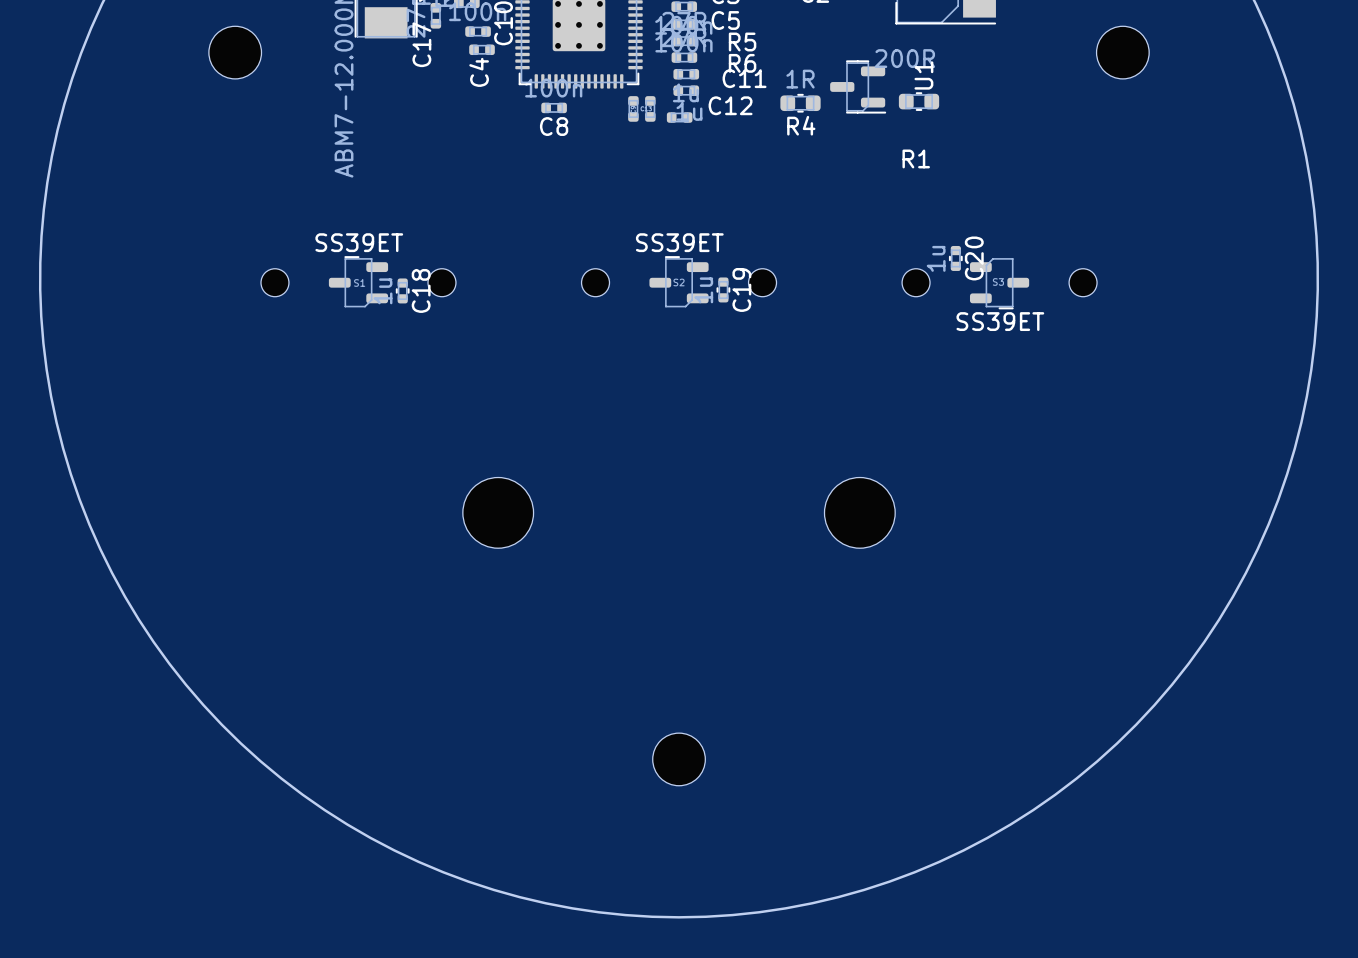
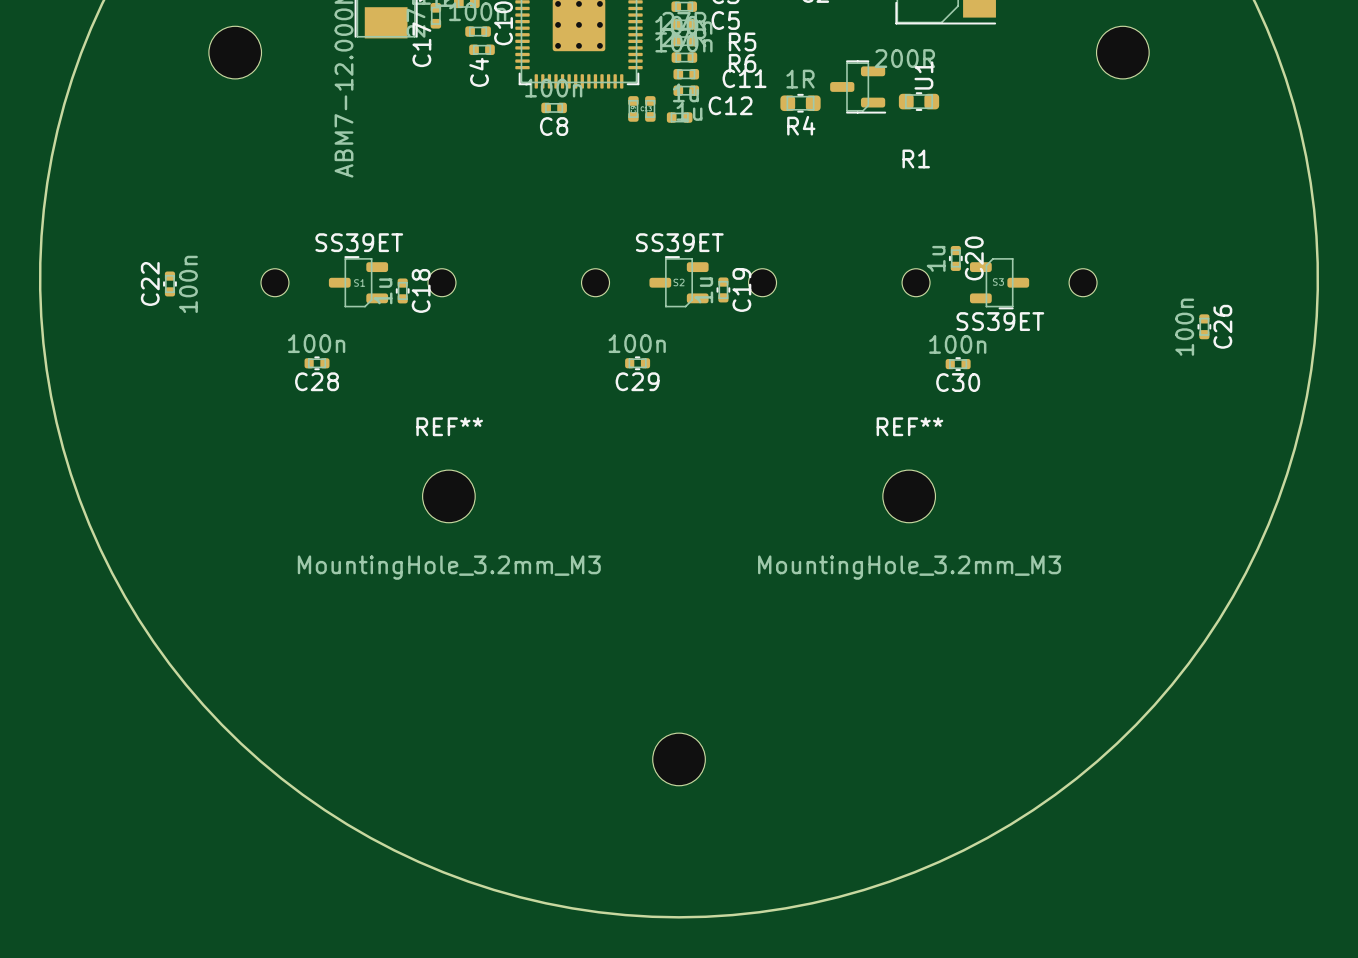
C22: none -> 100n (169, 283)
C26: none -> 100n (1204, 326)
C28: none -> 100n (317, 363)
C29: none -> 100n (637, 363)
C30: none -> 100n (958, 364)
REF**: none -> MountingHole_3.2mm_M3 (448, 496)
REF**: none -> MountingHole_3.2mm_M3 (909, 496)
part: (498, 512) -> none
part: (859, 512) -> none

